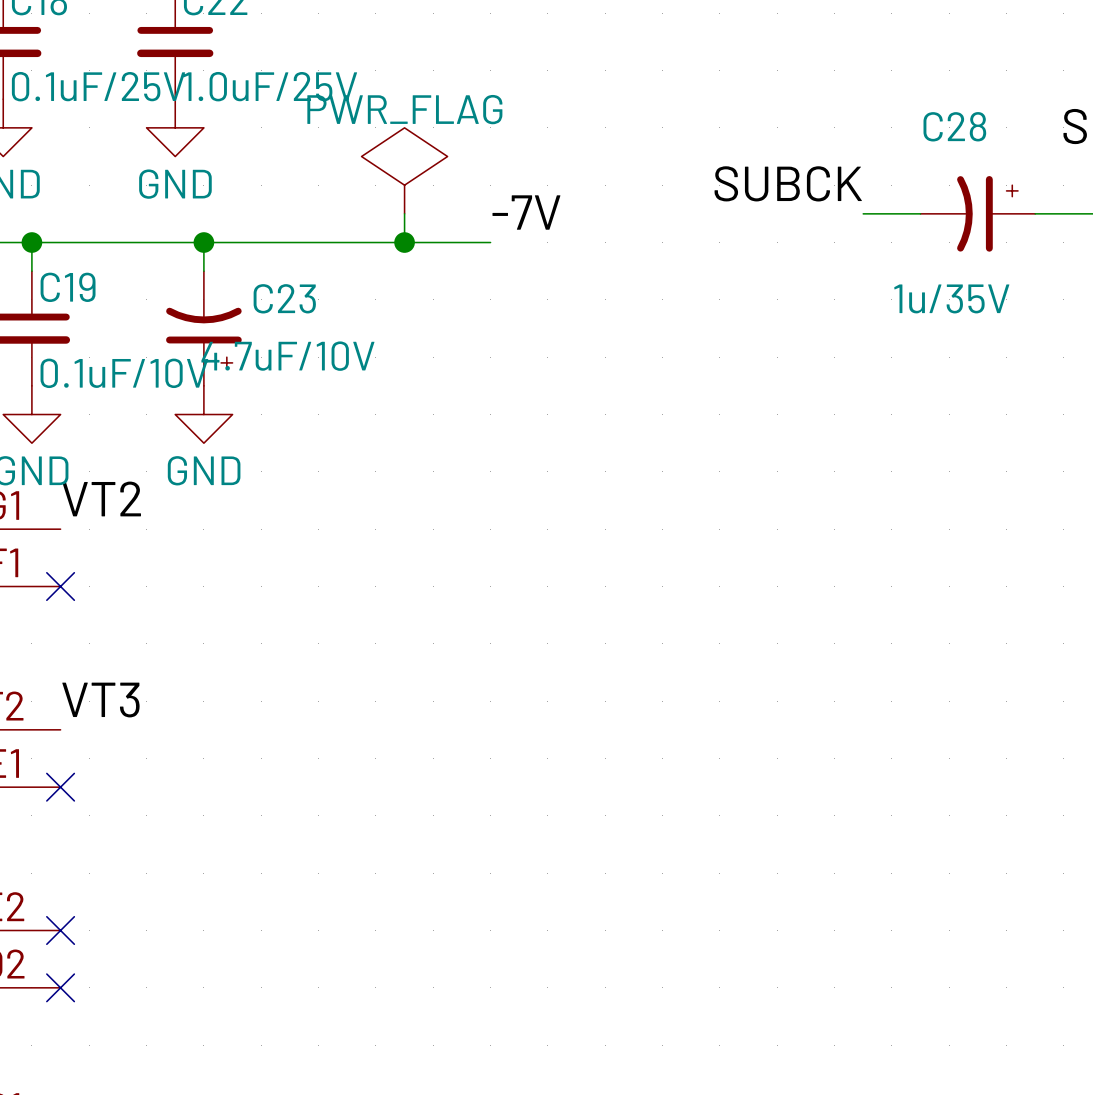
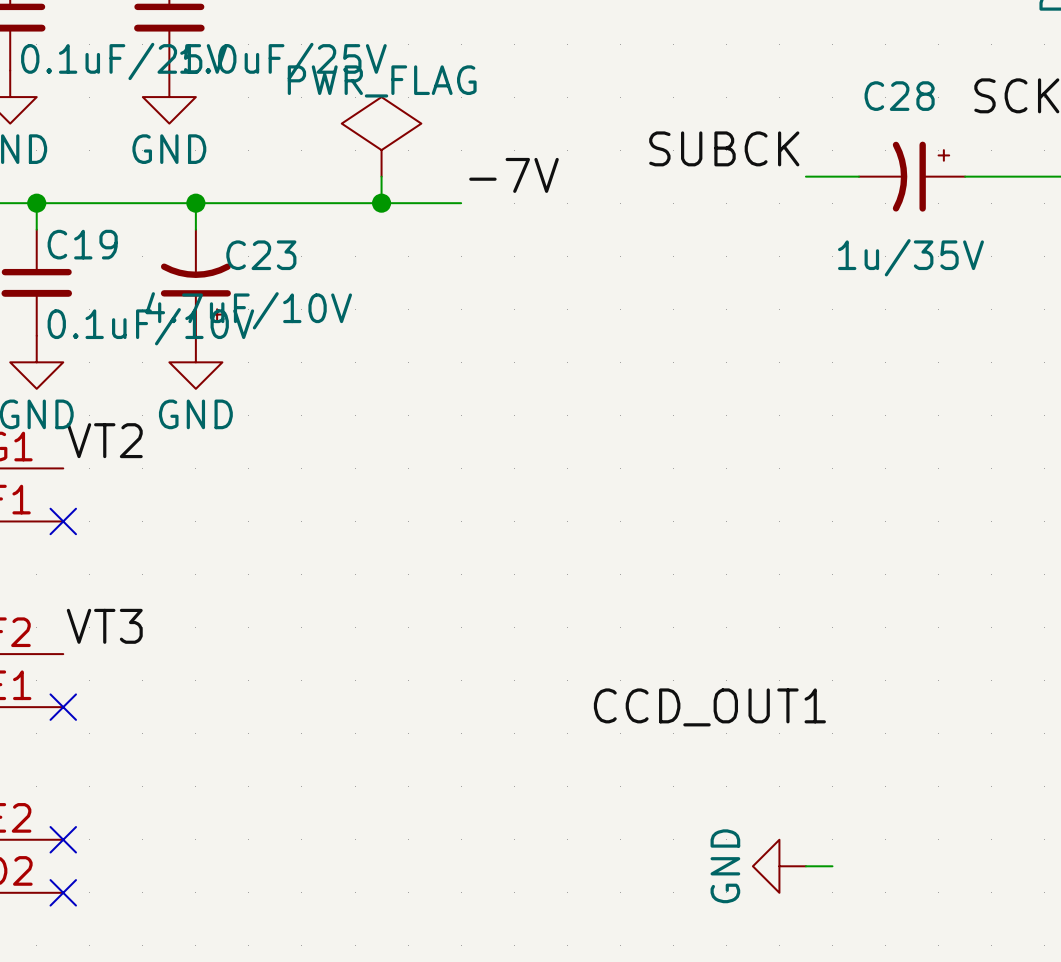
label: none -> CCD_OUT1 (709, 707)
power symbol: none -> GND (779, 866)
wire: none -> (805, 866) (832, 866)

